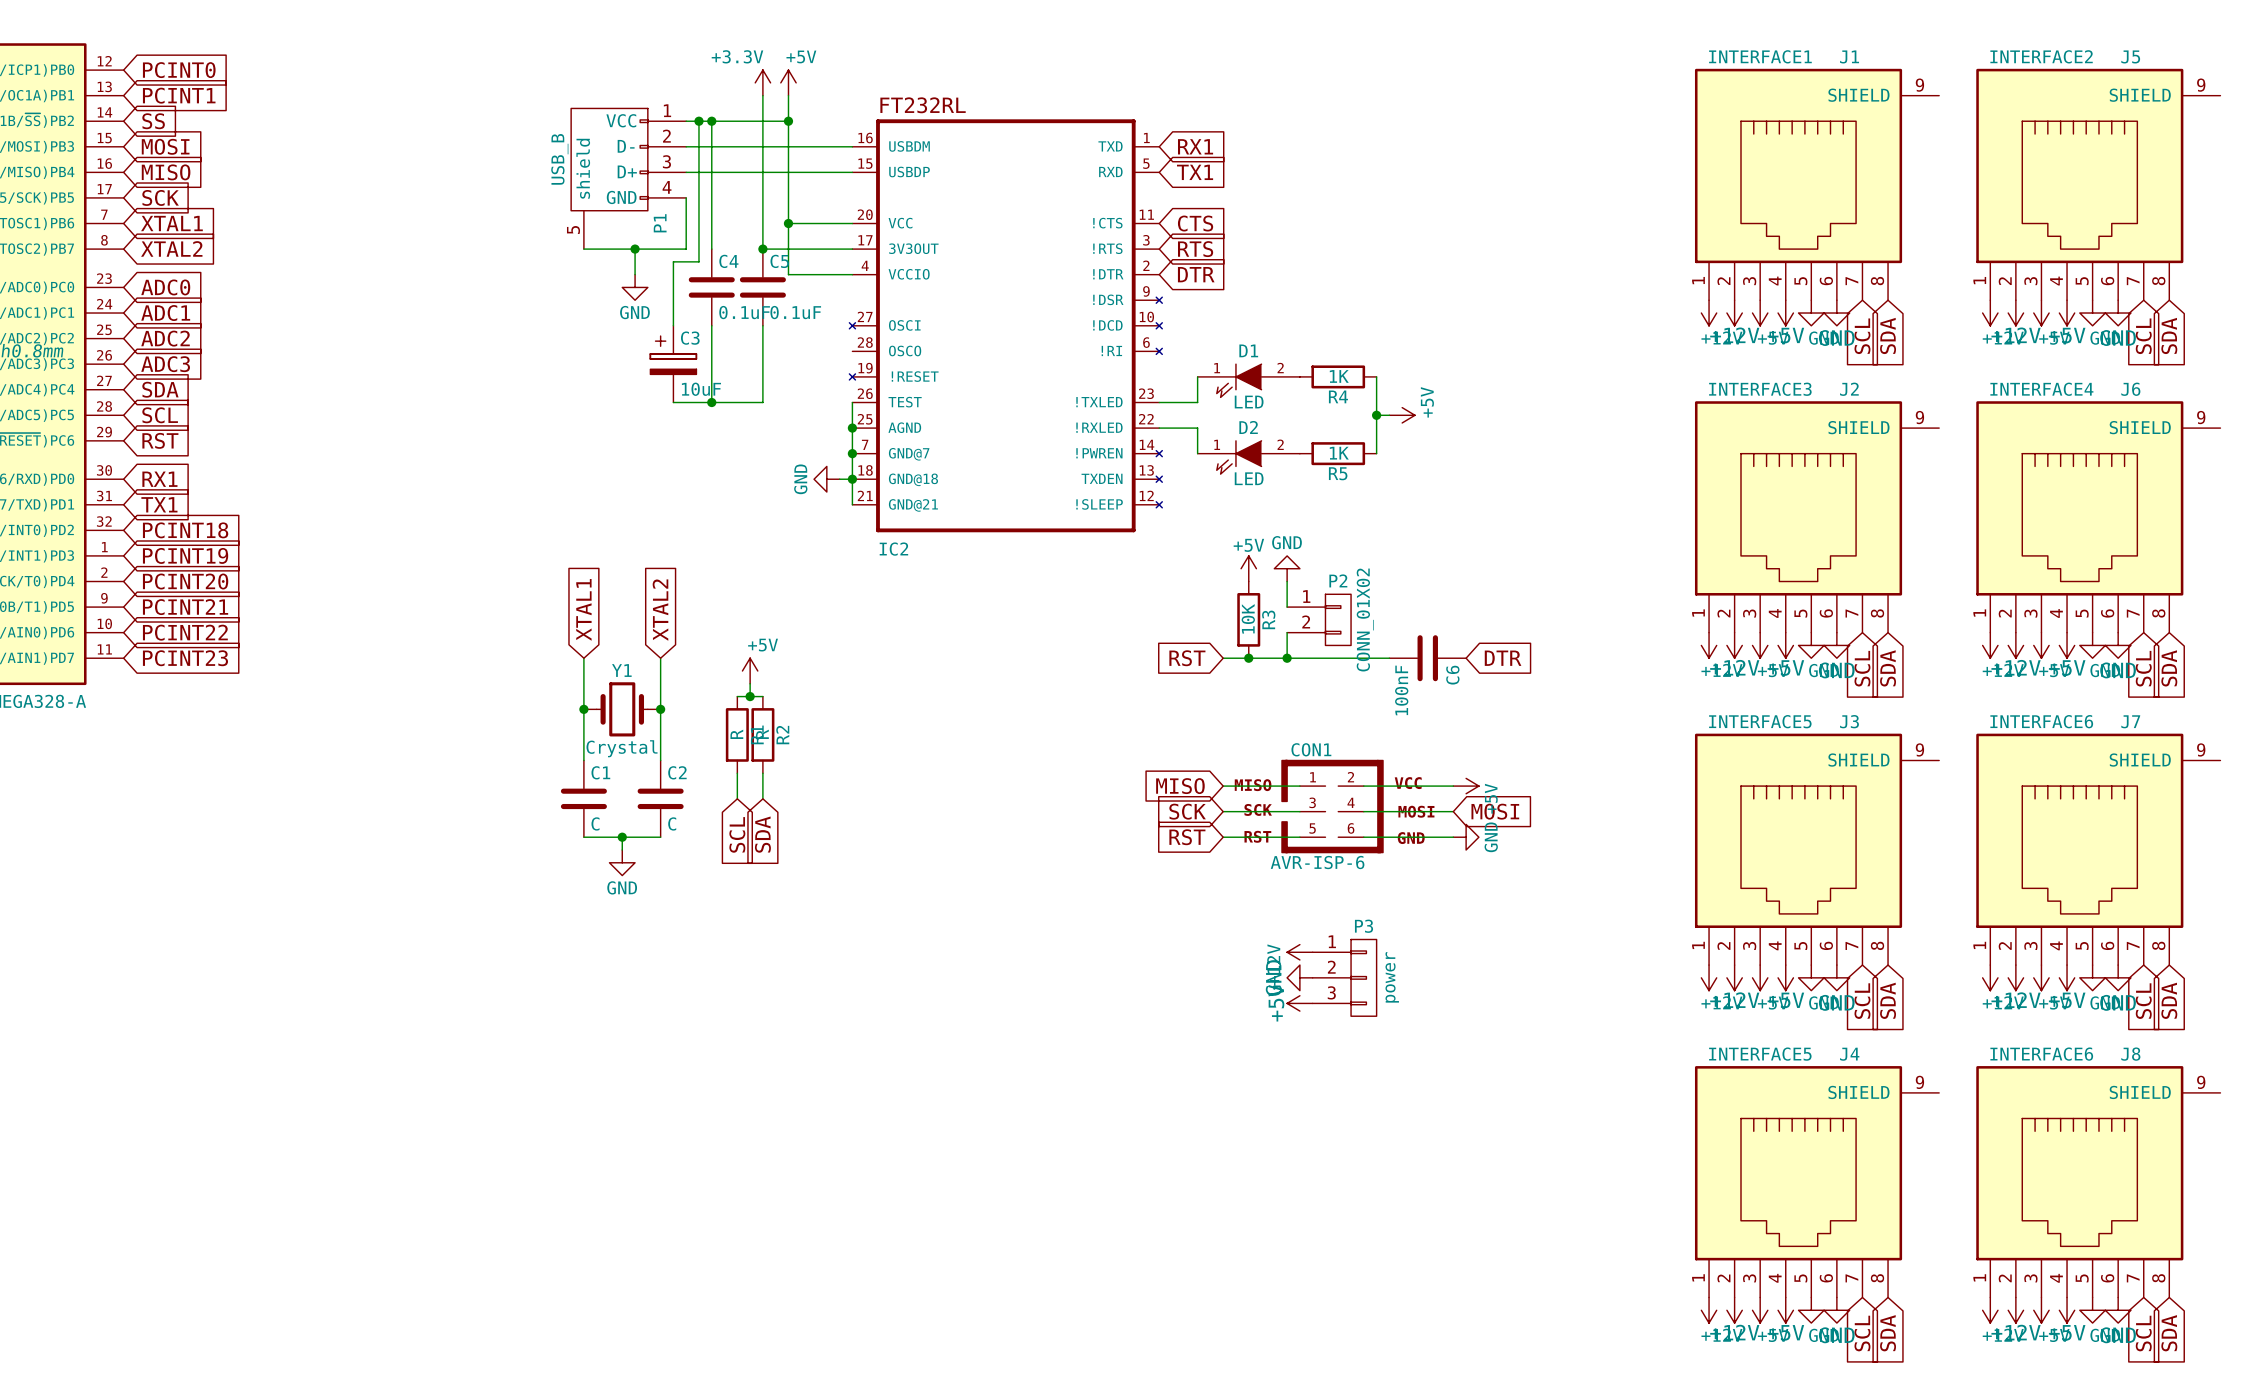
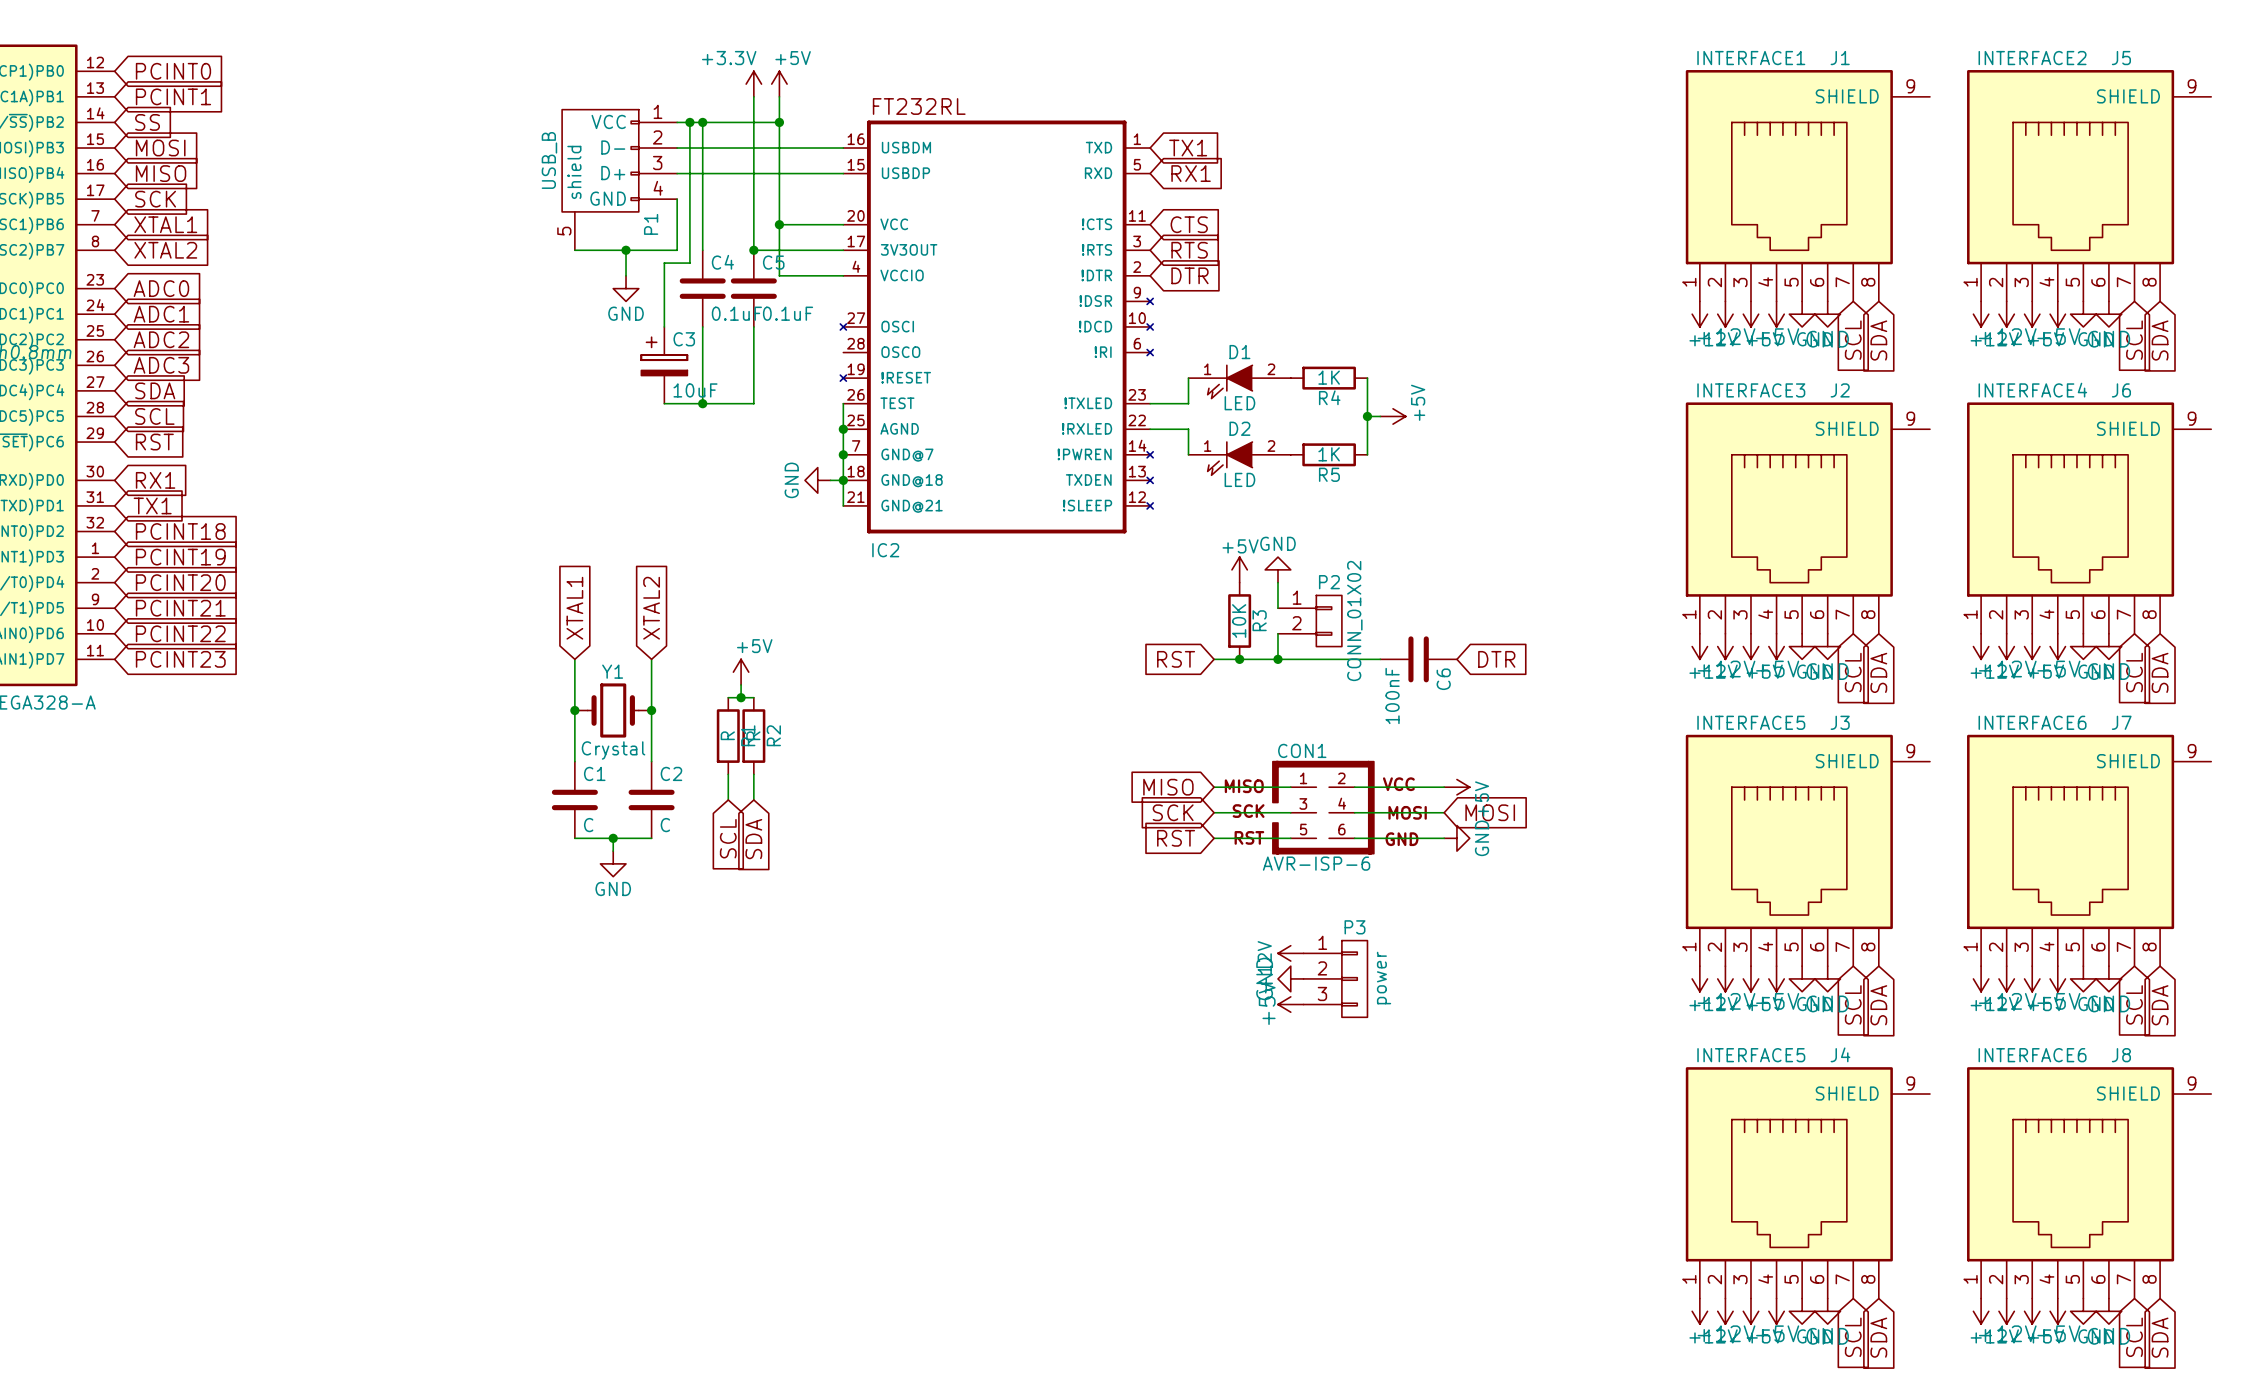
global label: RX1 (1195, 146) -> TX1 (1188, 148)
global label: TX1 (1195, 172) -> RX1 (1191, 173)

